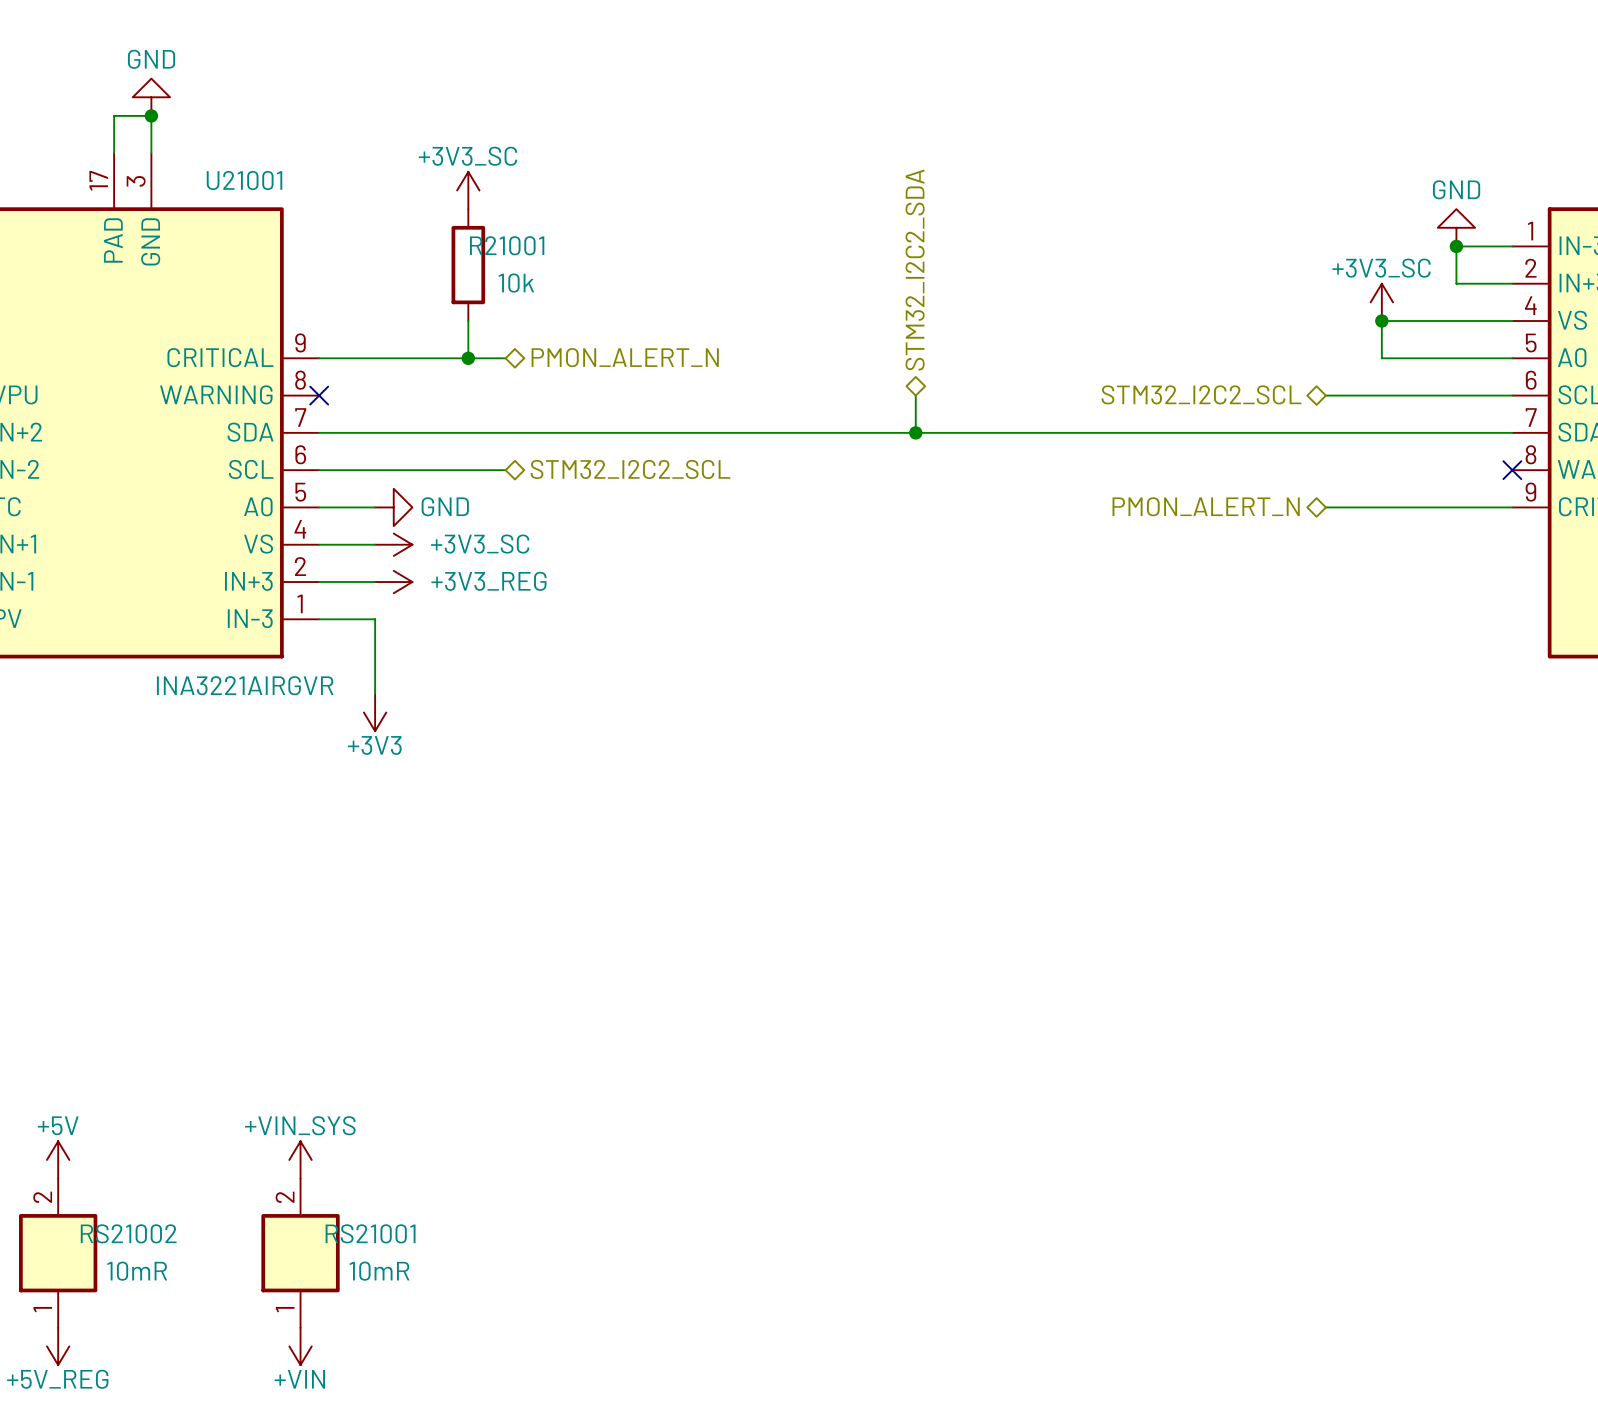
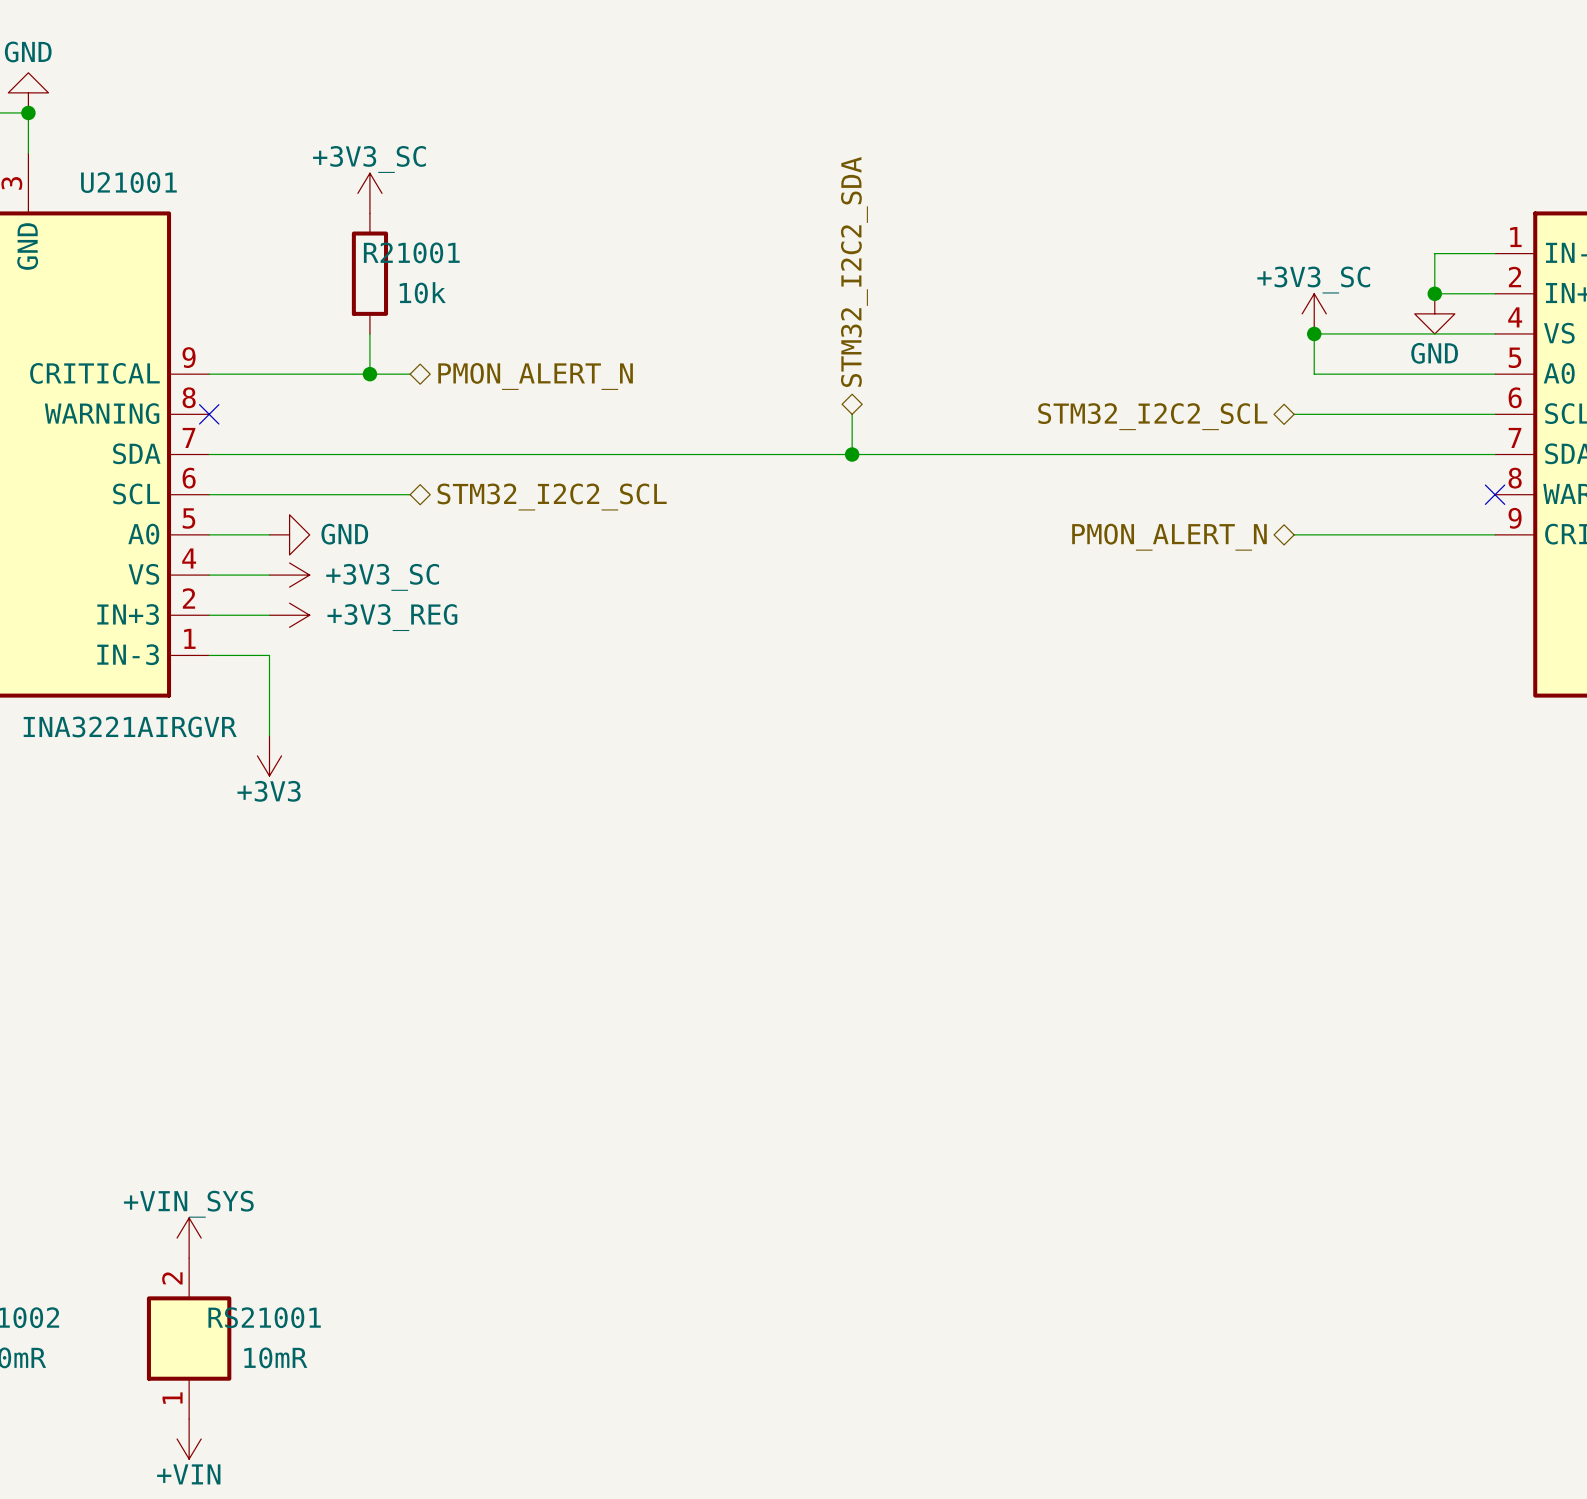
power symbol rotation: 0° (1456, 227) -> 180° (1434, 313)
power symbol position: GND (1456, 227) -> GND (1434, 313)
junction position: (1456, 246) -> (1434, 293)
power symbol position: +3V3_SC (1381, 302) -> +3V3_SC (1314, 313)
wire: (1381, 321) (1381, 358) -> (1354, 333) (1314, 333) (1314, 374) (1354, 374)
junction position: (1381, 321) -> (1314, 333)

